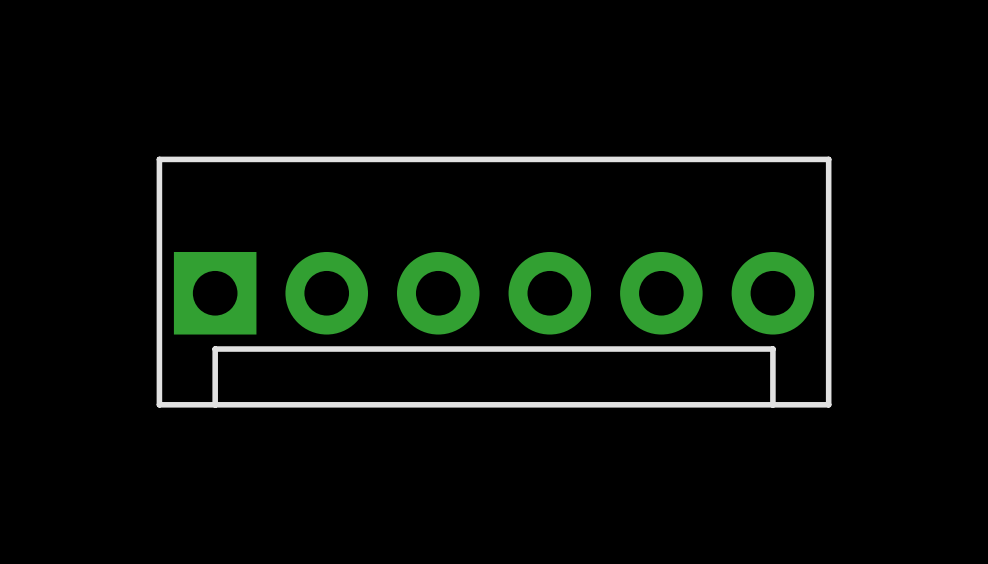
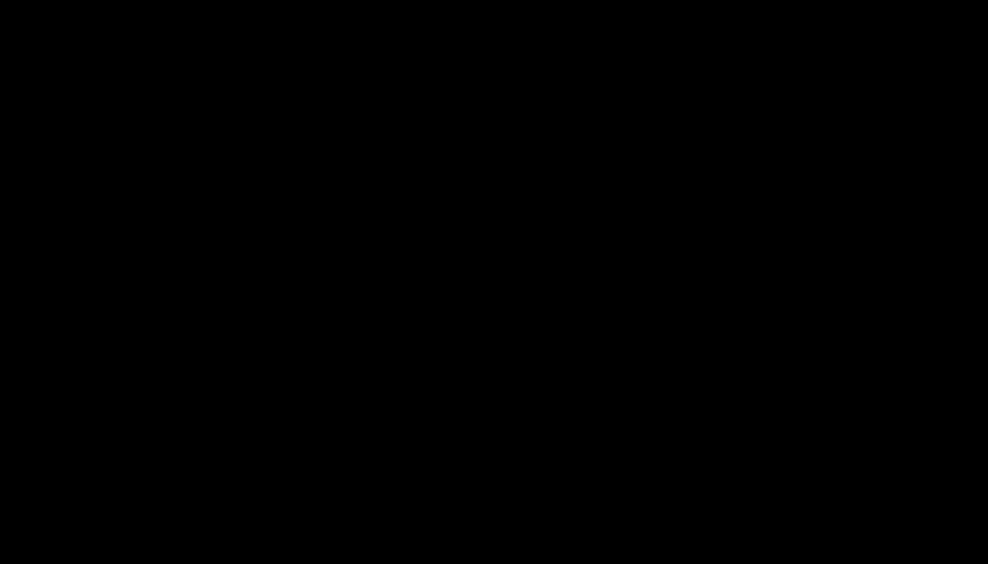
part: (494, 282) -> none

